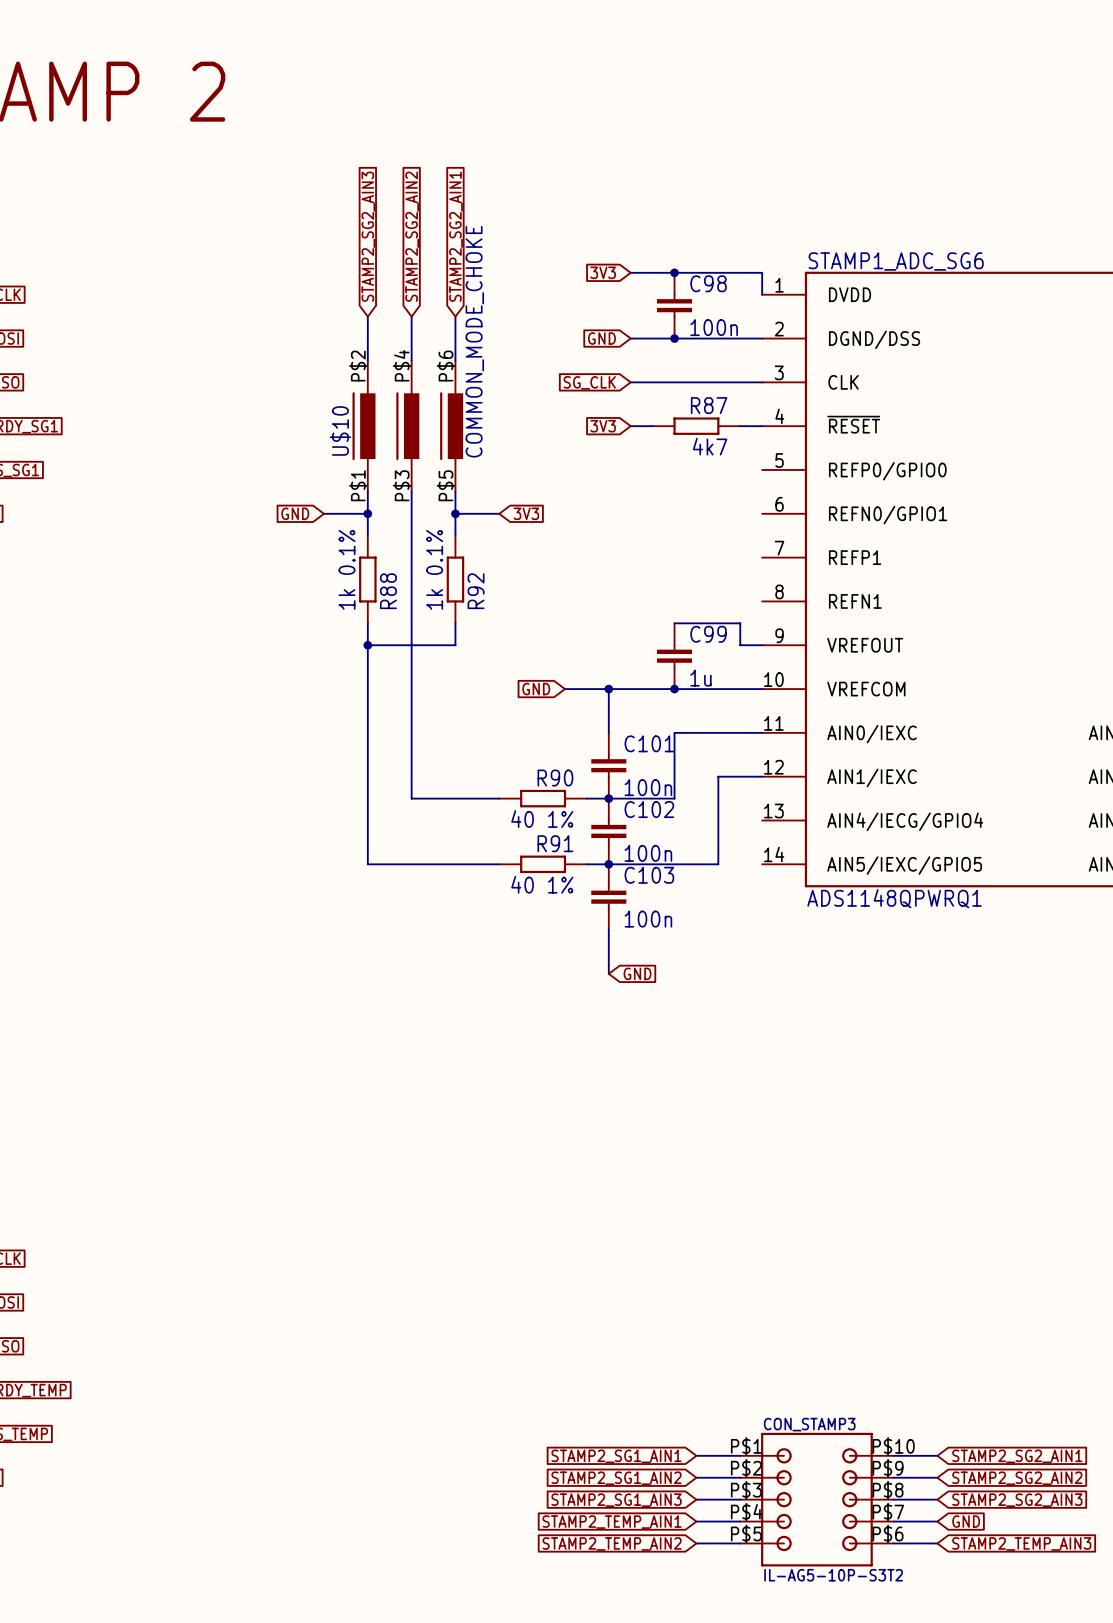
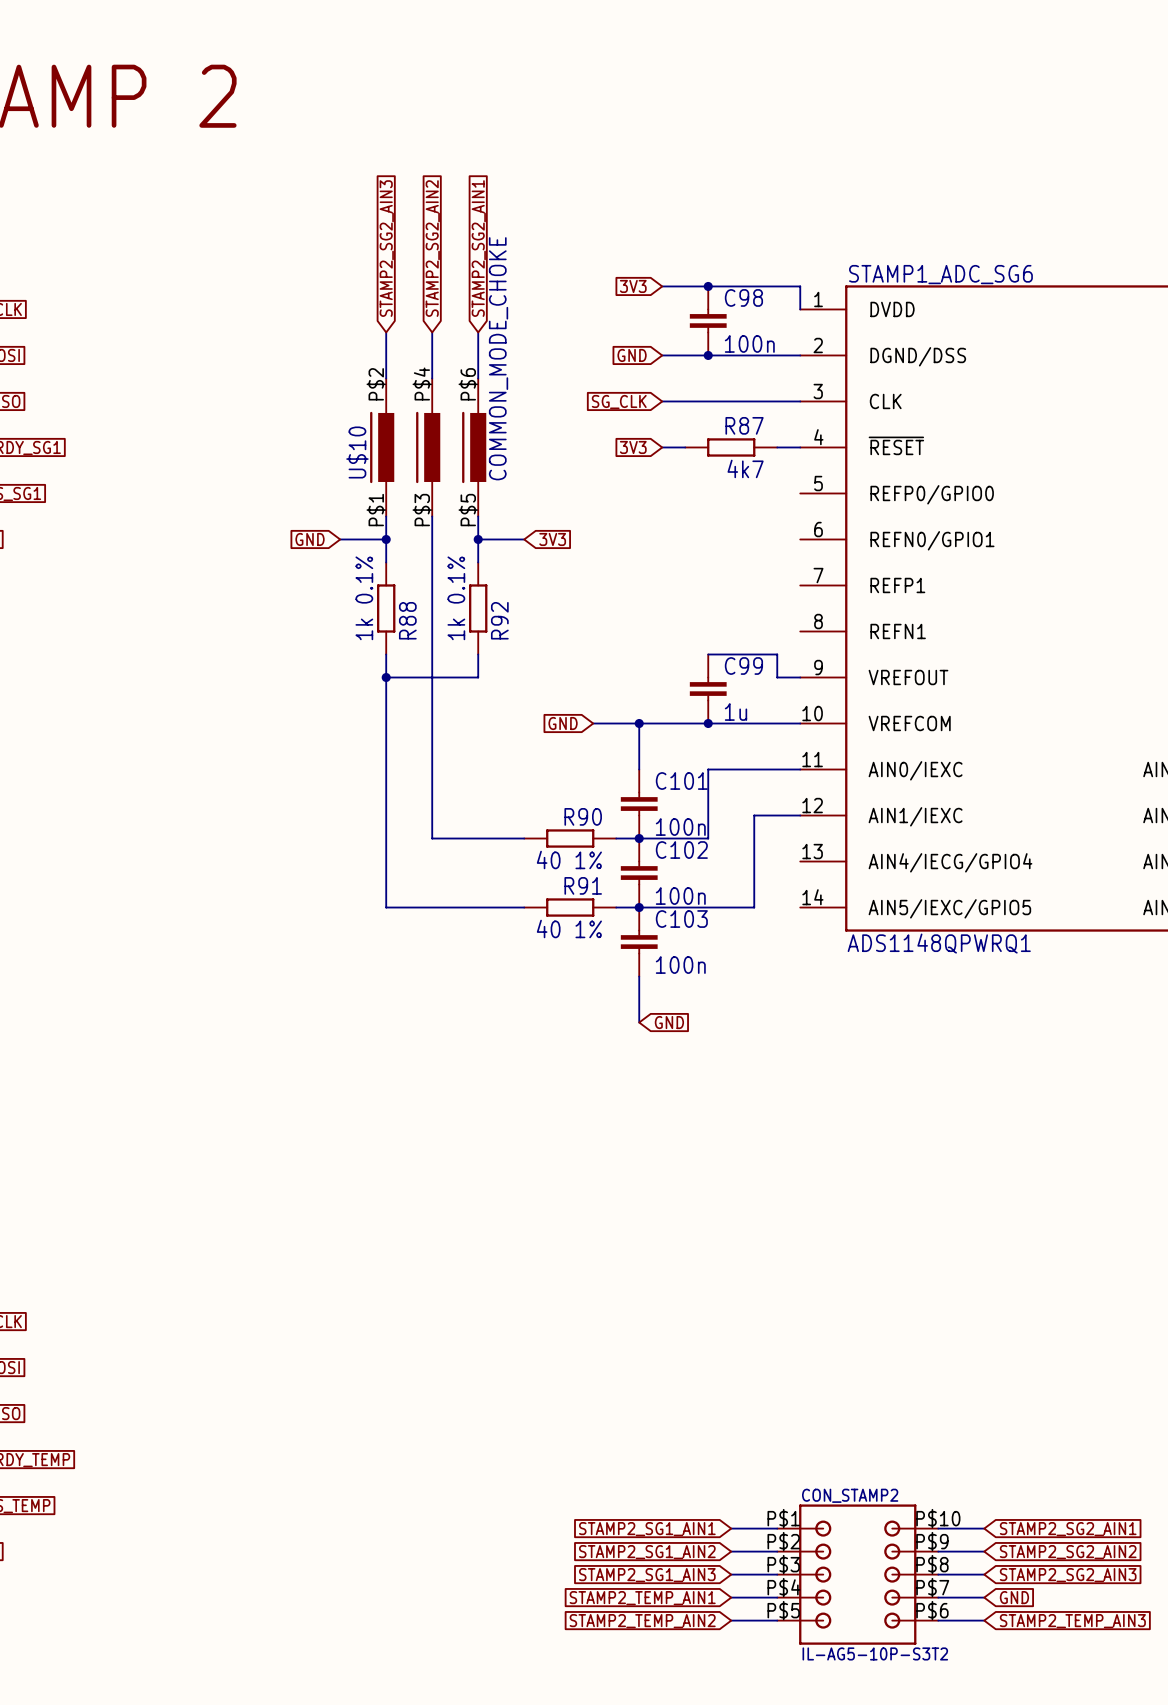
CON_STAMP3 name: CON_STAMP3 (809, 1424) -> CON_STAMP2 (850, 1495)

